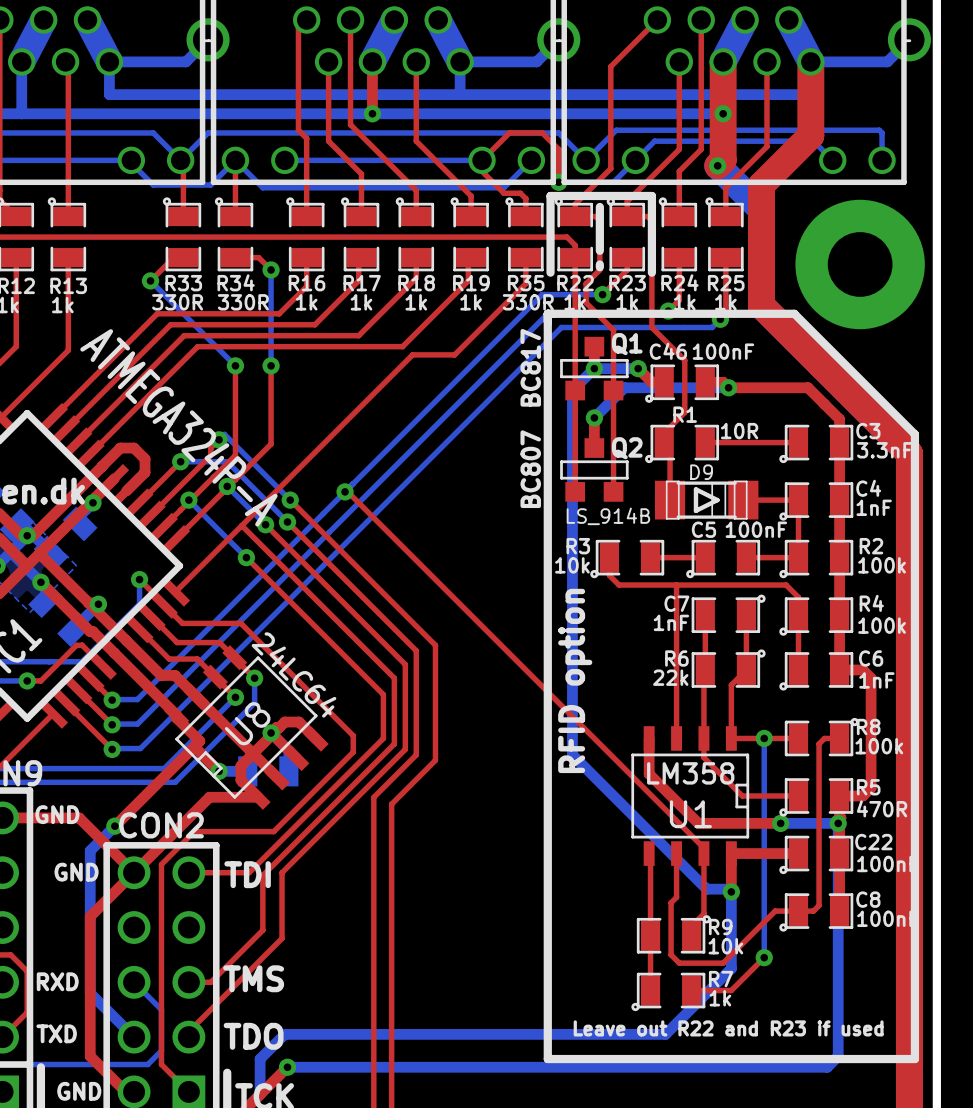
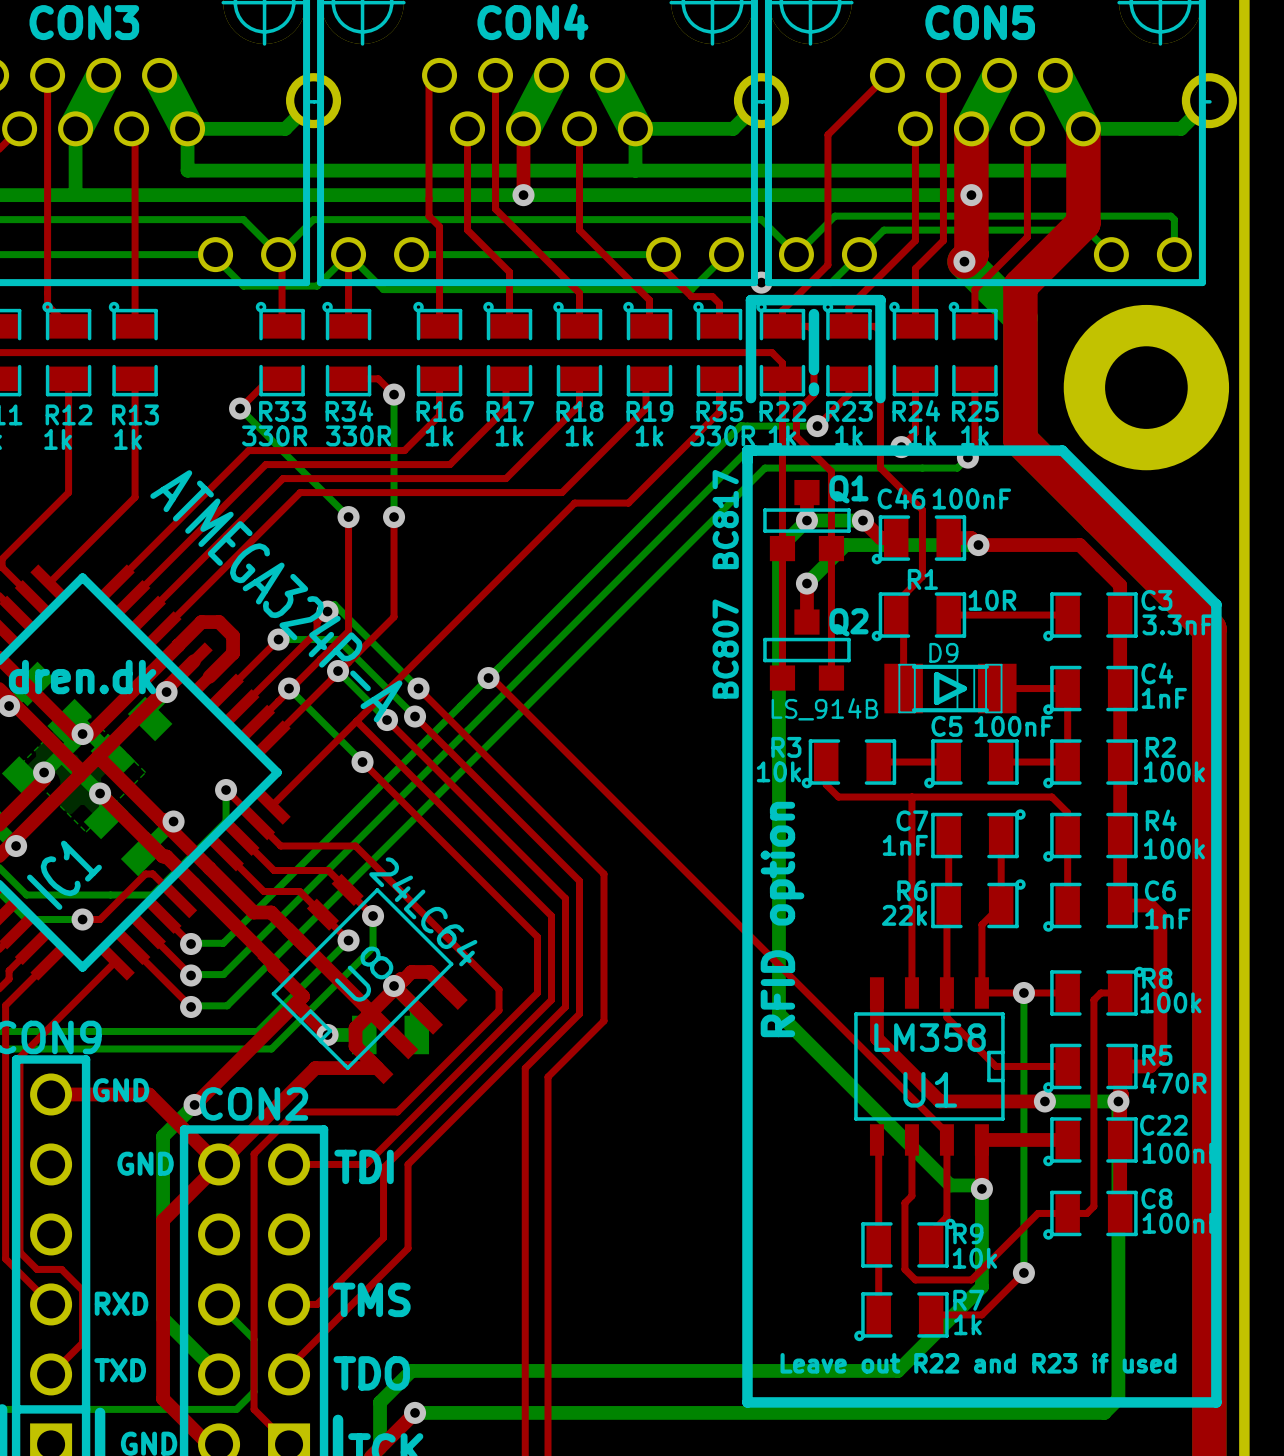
top track: (482, 160) (509, 132) (542, 132) (558, 149) (558, 182) -> none

